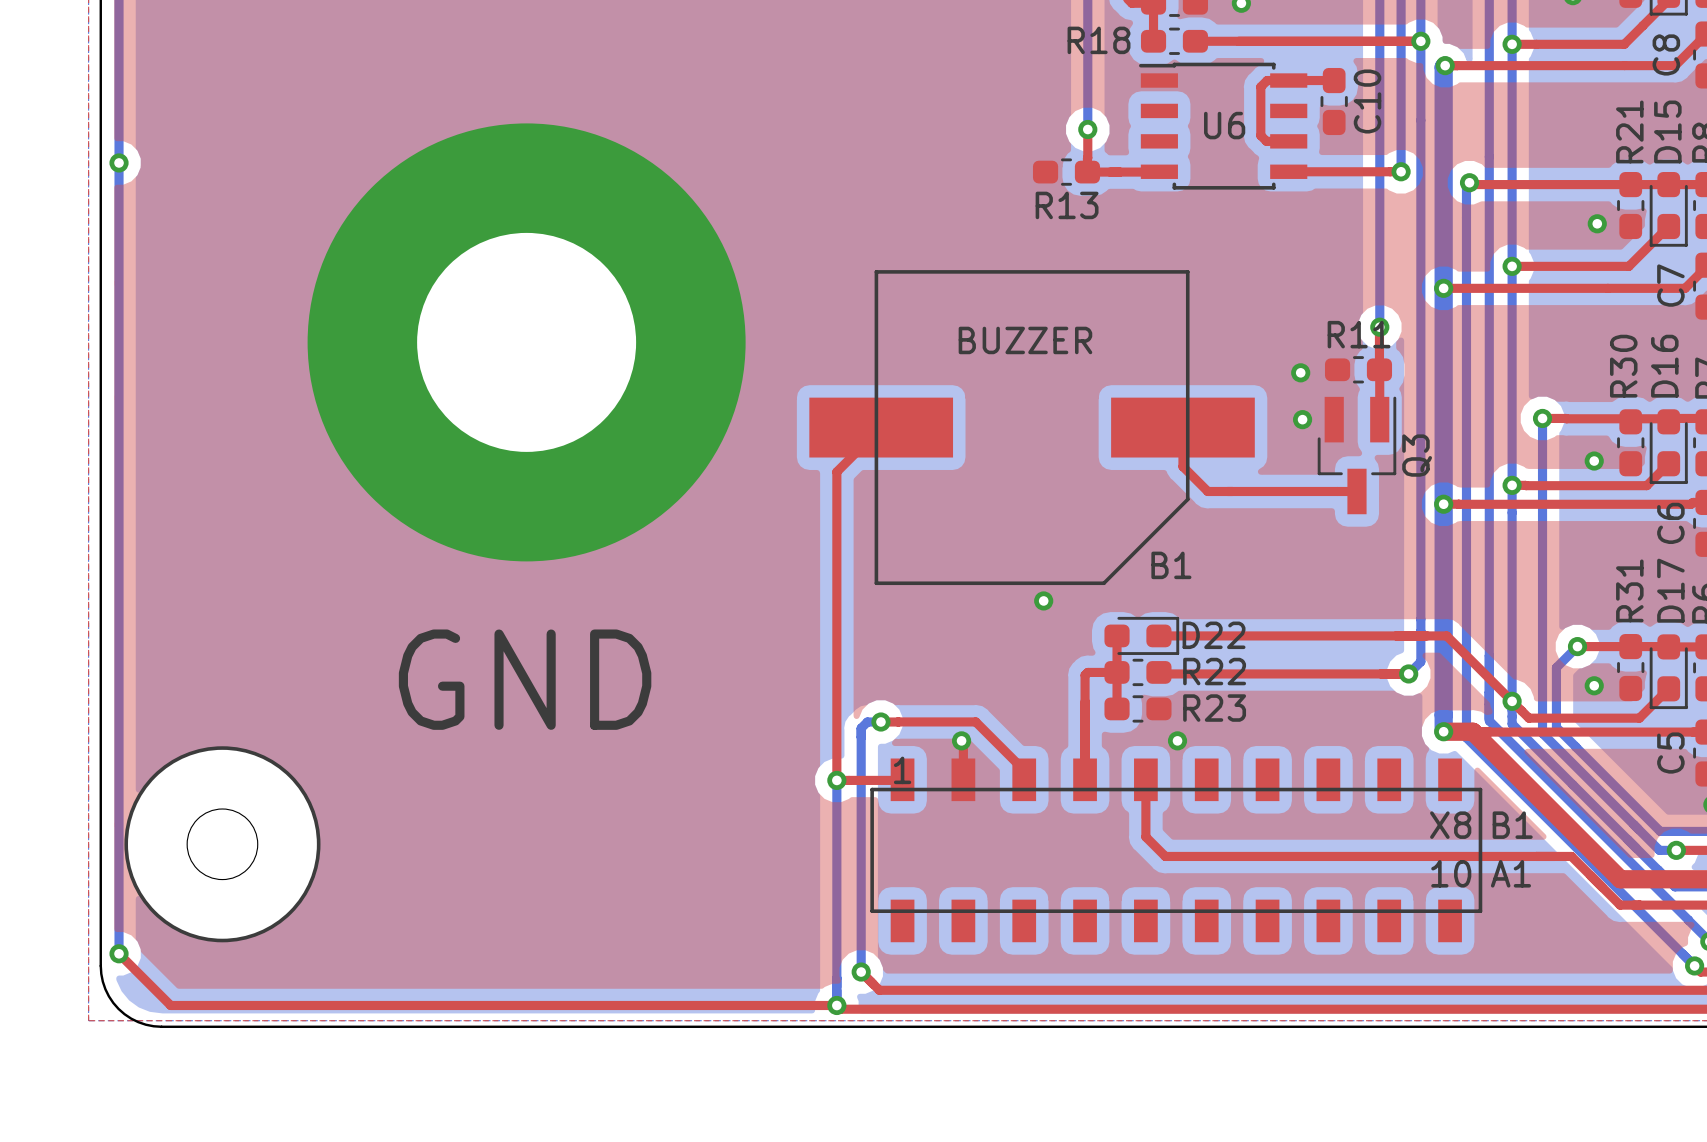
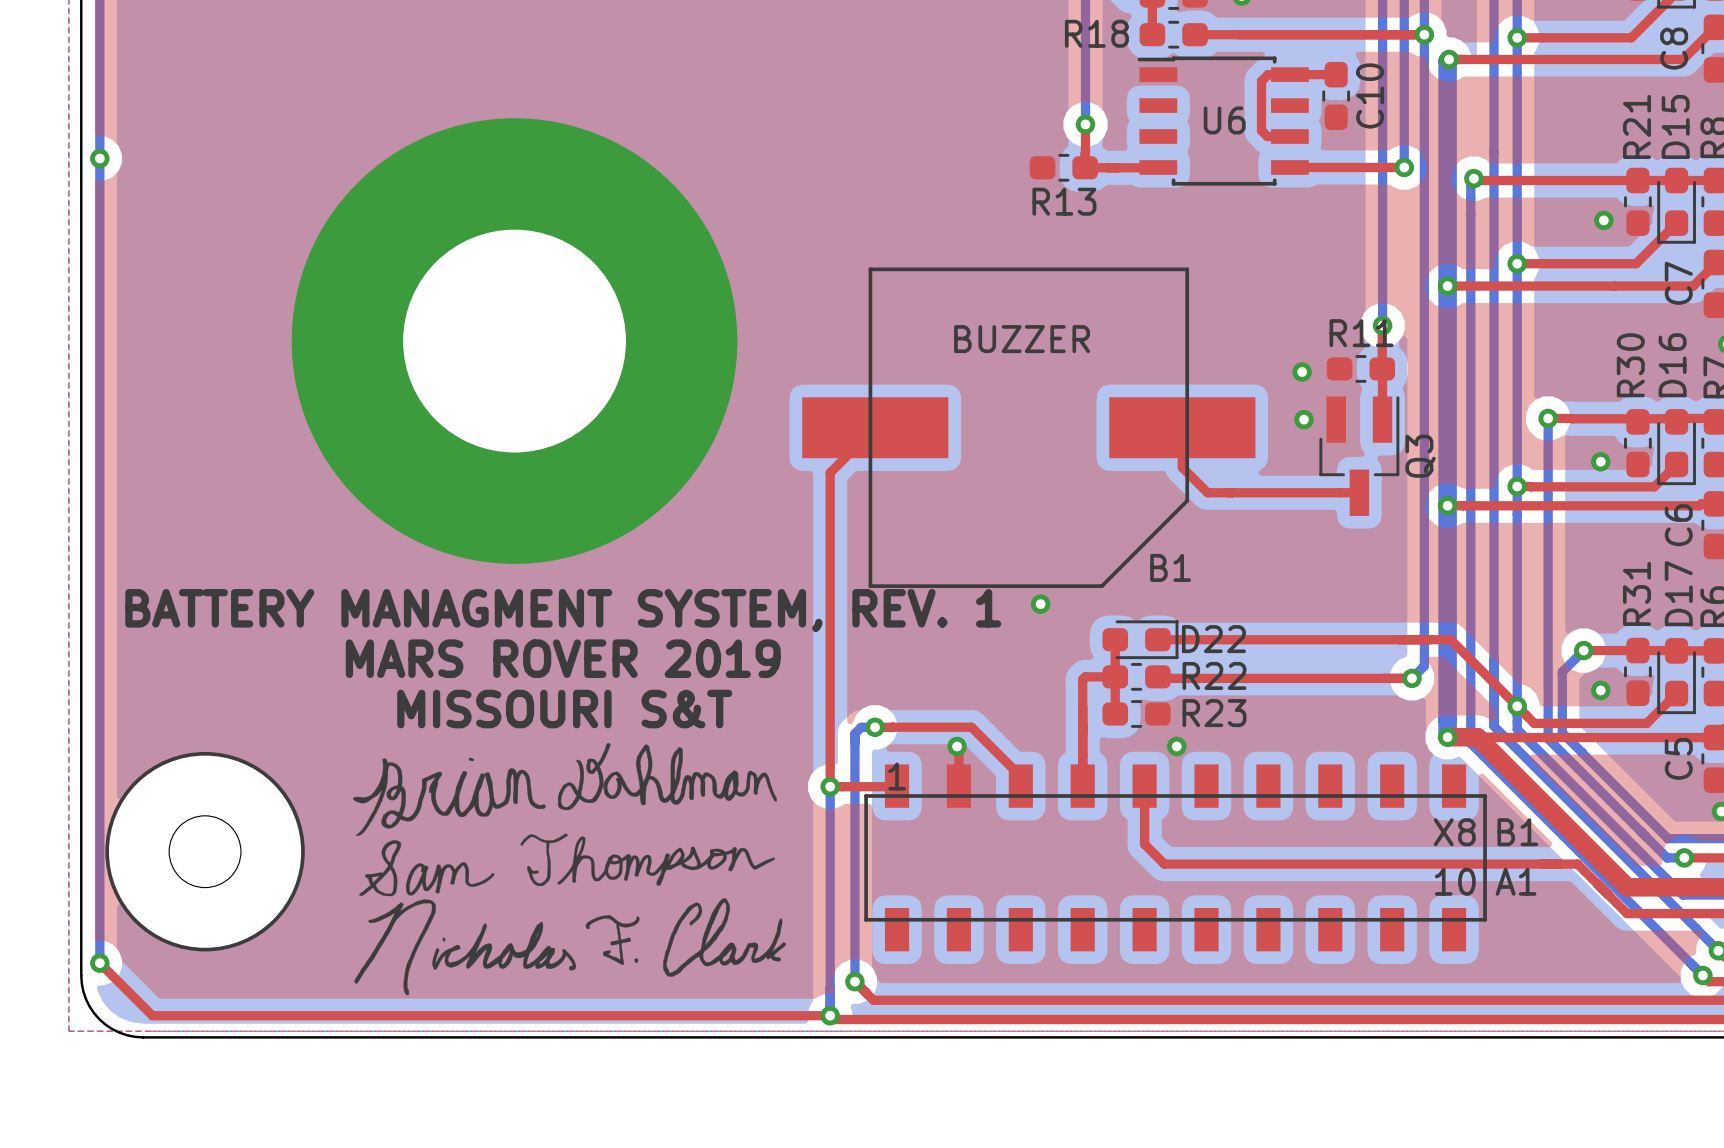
text: none -> BATTERY MANAGMENT SYSTEM, REV. 1 (563, 610)
text: none -> MARS ROVER 2019 (563, 658)
text: GND (525, 679) -> none
text: none -> MISSOURI S&T (564, 709)
drawing: none -> [353, 743, 786, 996]

